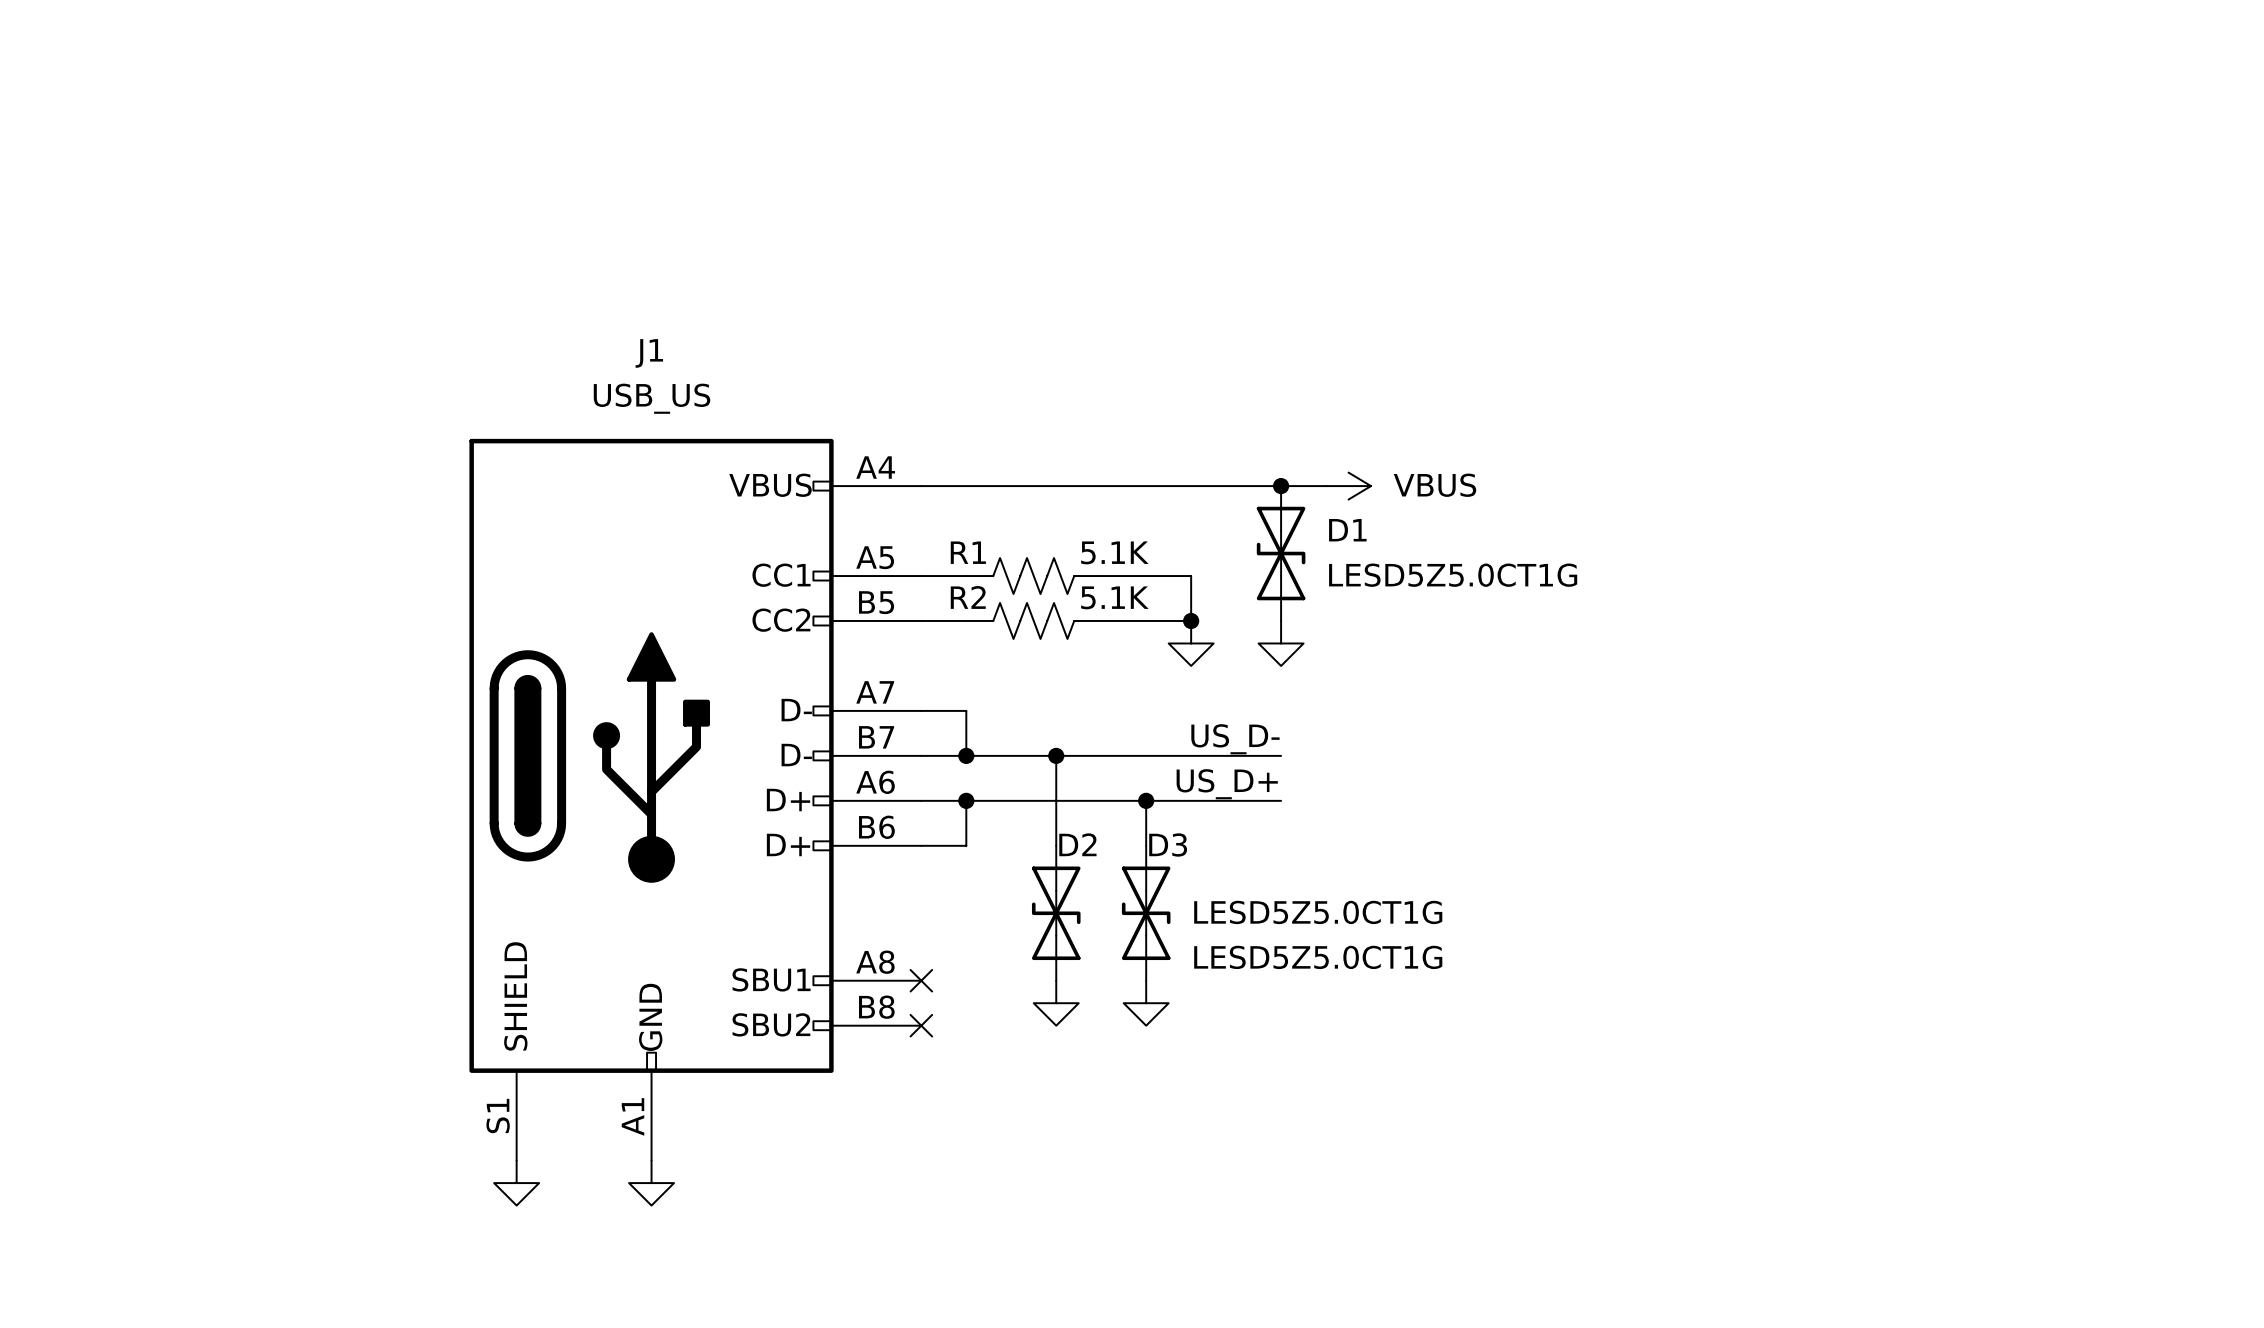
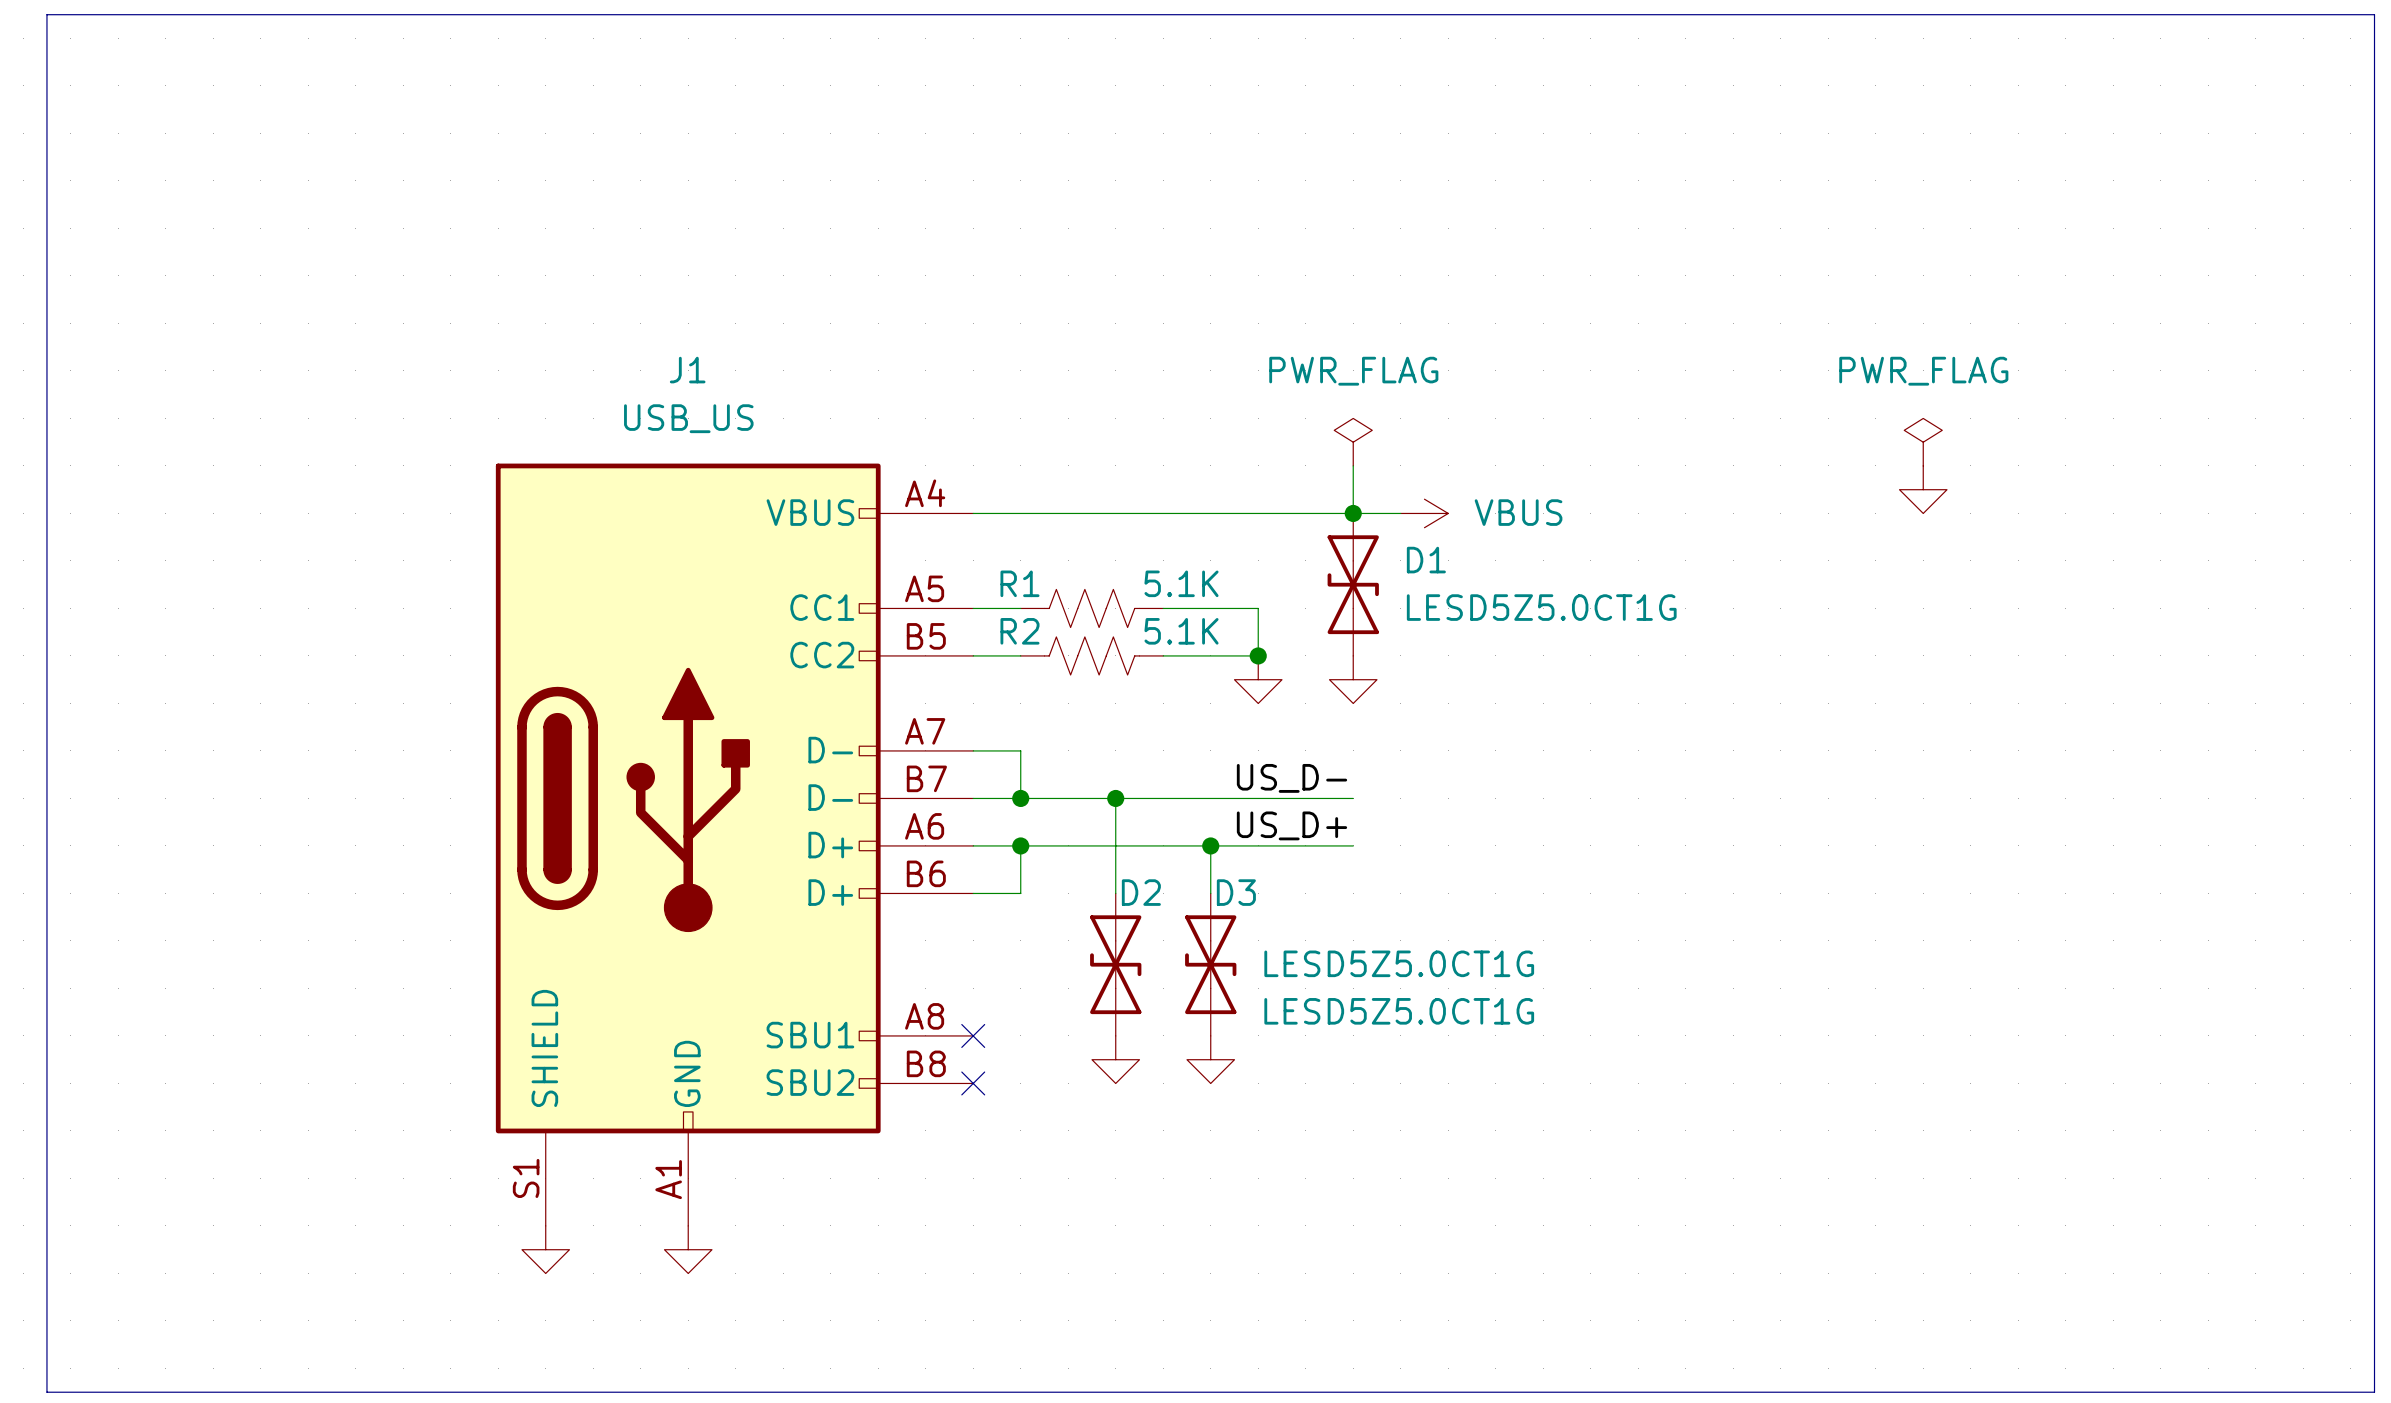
line: none -> (46, 14) (46, 1392) (2374, 1392) (2374, 14) (46, 14)
power symbol: none -> PWR_FLAG (1353, 442)
power symbol: none -> PWR_FLAG (1923, 442)
wire: none -> (1353, 465) (1353, 513)
power symbol: none -> (1923, 489)

